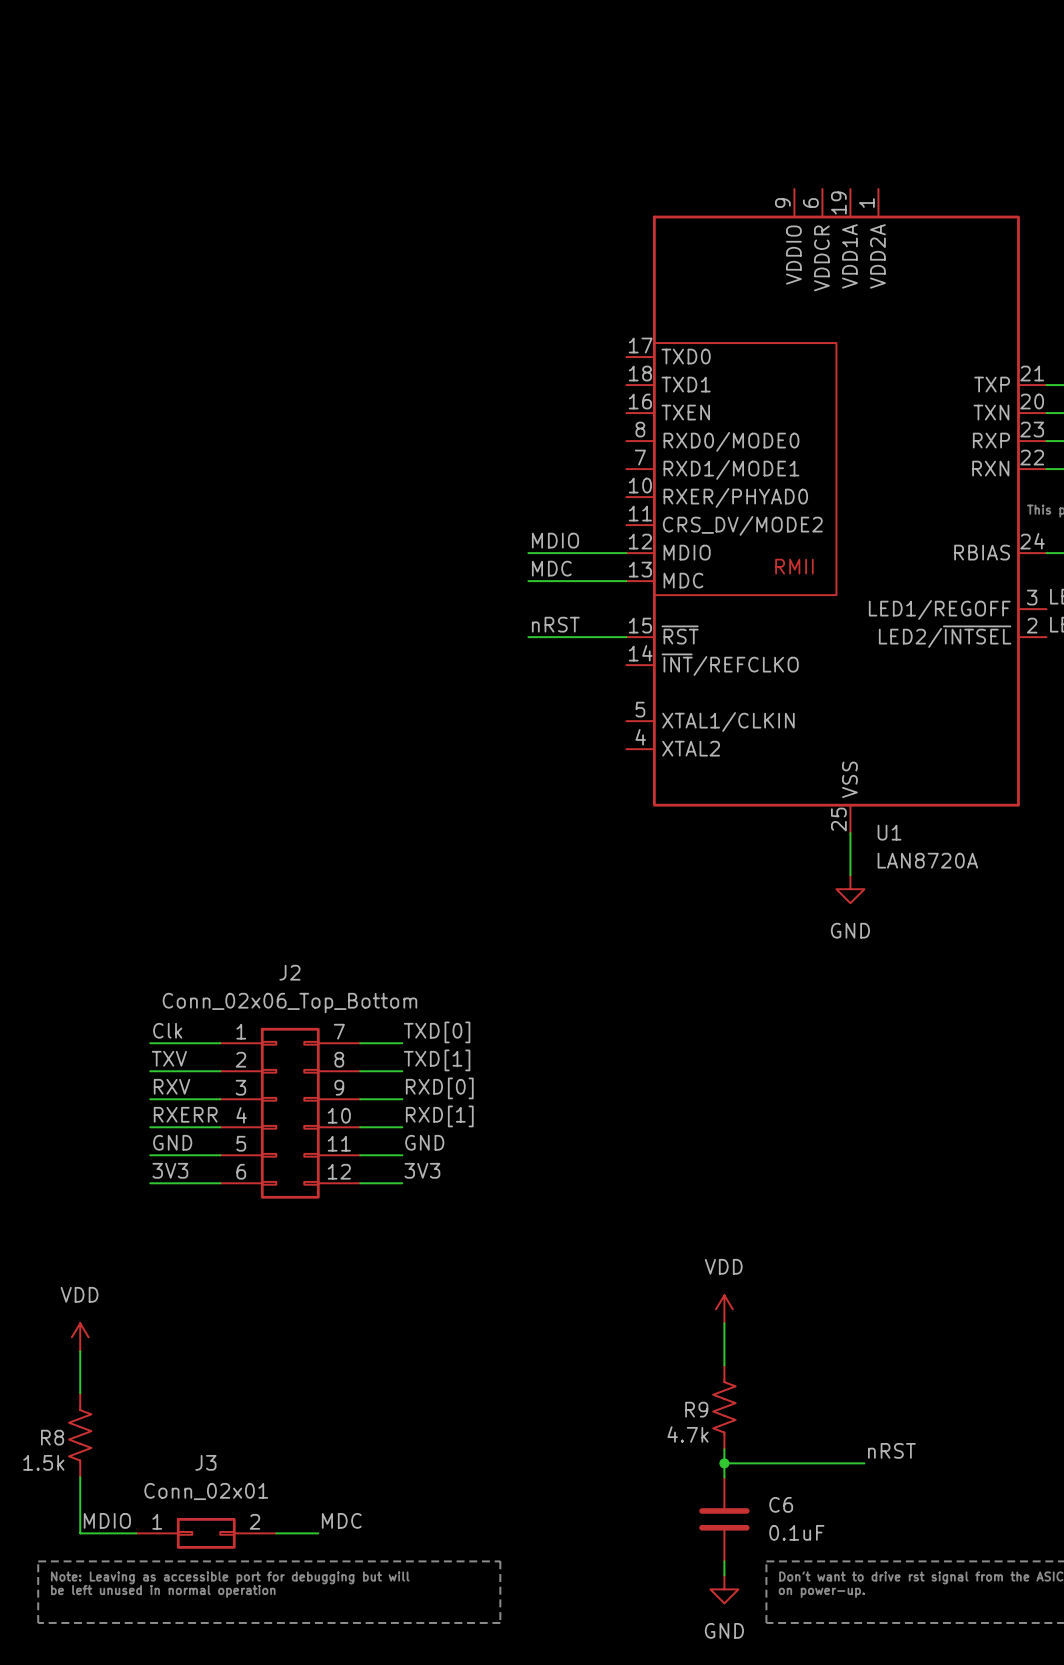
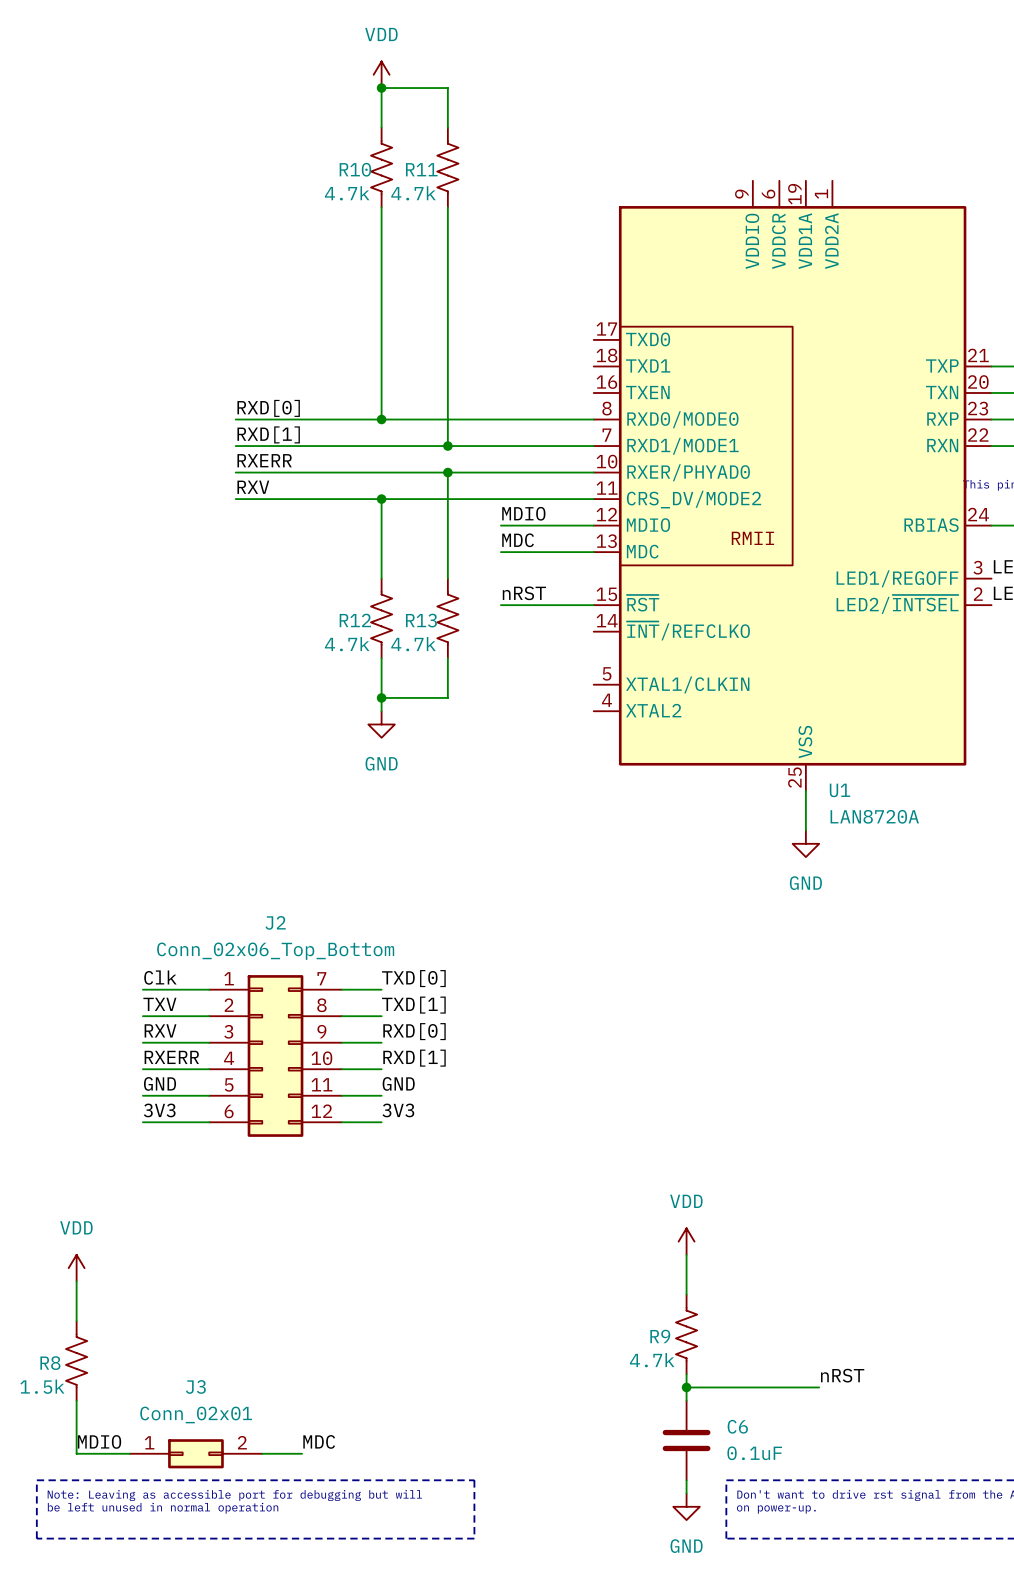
power symbol: none -> VDD (381, 74)
junction: none -> (381, 88)
wire: none -> (381, 127) (381, 88) (447, 88) (447, 127)
R10: none -> 4.7k (381, 167)
R11: none -> 4.7k (447, 167)
wire: none -> (381, 207) (381, 419)
wire: none -> (447, 207) (447, 446)
label: none -> RXD[0] (268, 408)
wire: none -> (235, 419) (593, 419)
junction: none -> (381, 419)
label: none -> RXD[1] (268, 434)
wire: none -> (235, 446) (593, 446)
junction: none -> (447, 446)
label: none -> RXERR (264, 460)
wire: none -> (235, 472) (593, 472)
wire: none -> (447, 472) (447, 578)
junction: none -> (447, 472)
label: none -> RXV (253, 487)
wire: none -> (235, 499) (593, 499)
wire: none -> (381, 499) (381, 578)
junction: none -> (381, 499)
R12: none -> 4.7k (381, 618)
R13: none -> 4.7k (447, 618)
wire: none -> (381, 658) (381, 711)
wire: none -> (447, 658) (447, 697) (381, 697)
junction: none -> (381, 697)
power symbol: none -> GND (381, 724)

